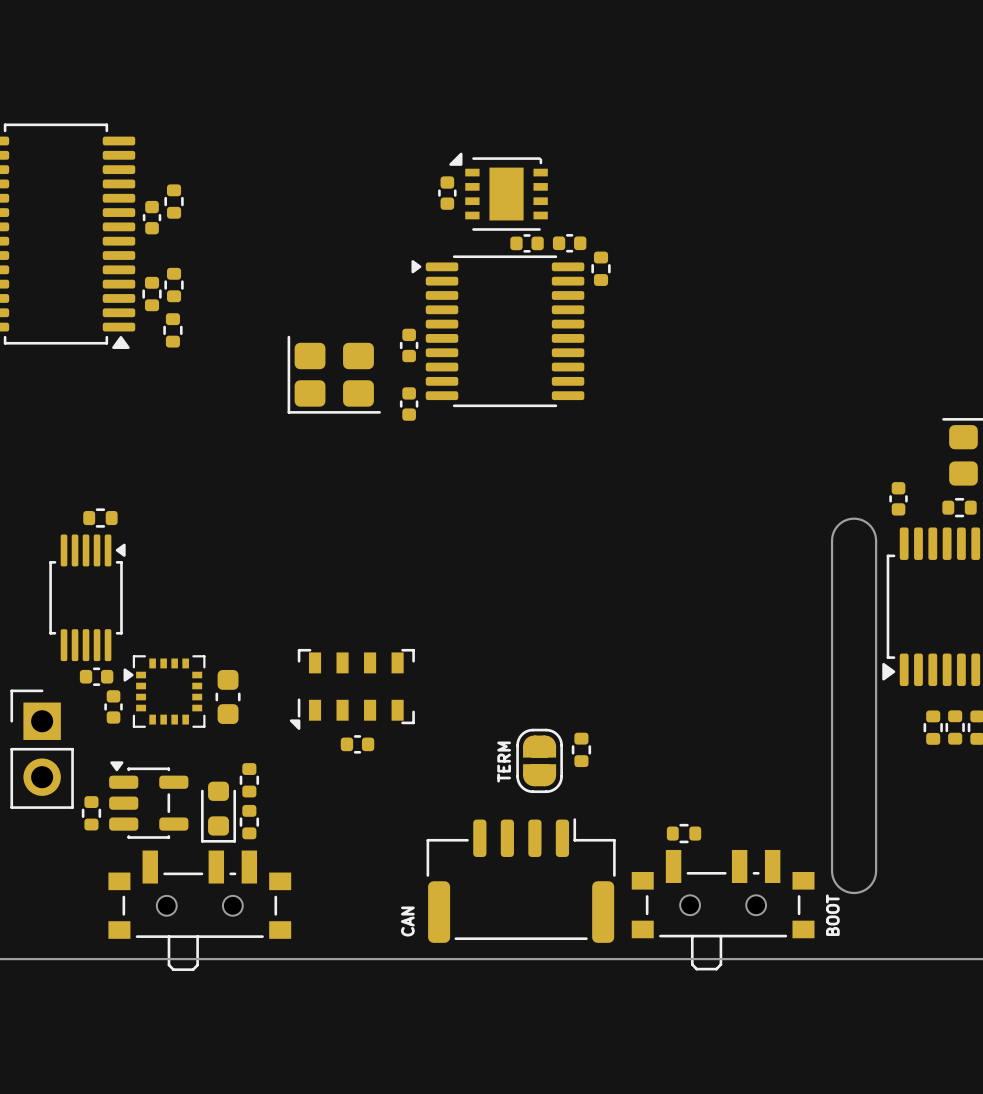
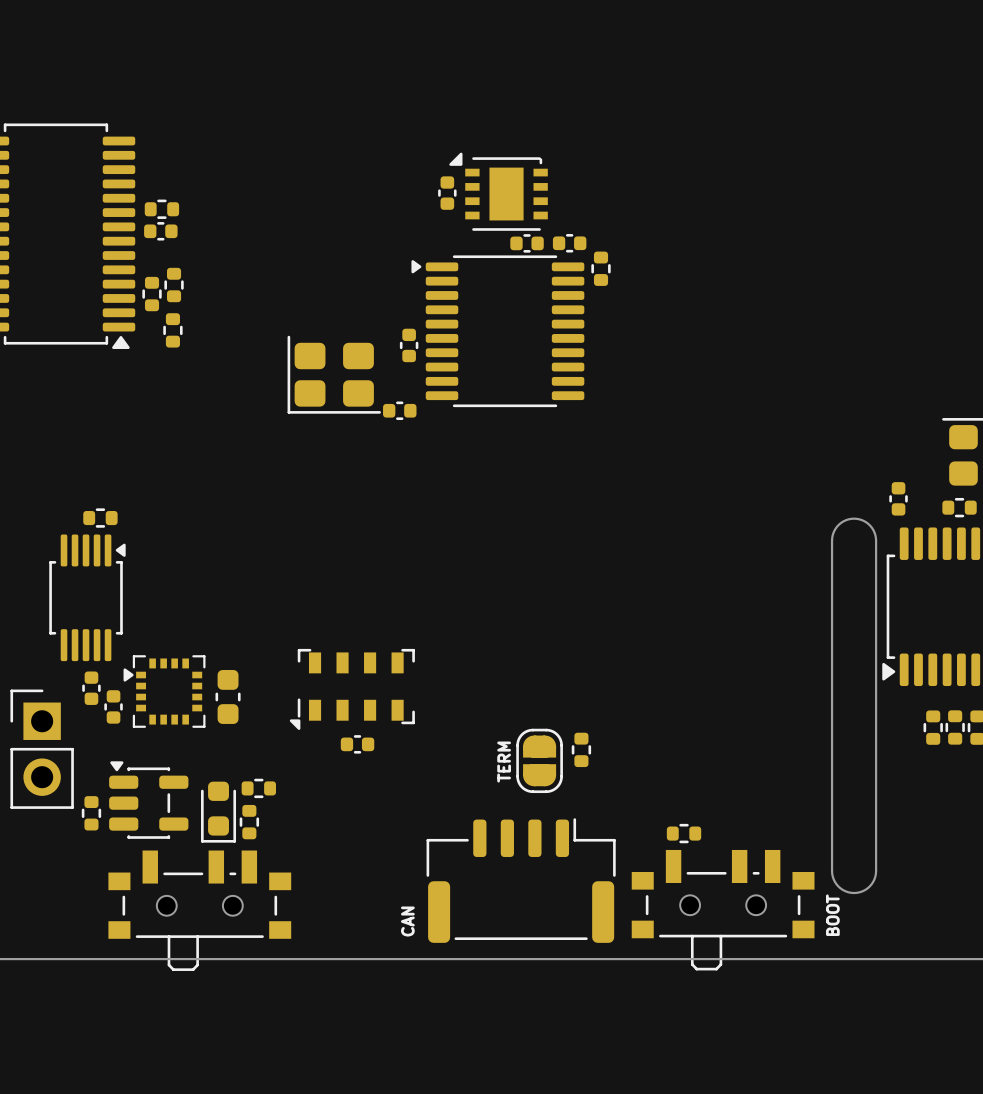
part rotation: 0° (174, 201) -> 90° clockwise (161, 209)
part rotation: 0° (152, 217) -> 90° clockwise (160, 231)
part rotation: 0° (409, 404) -> 90° clockwise (399, 410)
part rotation: 0° (96, 676) -> 90° clockwise (91, 688)
part rotation: 0° (249, 780) -> 90° clockwise (258, 788)

